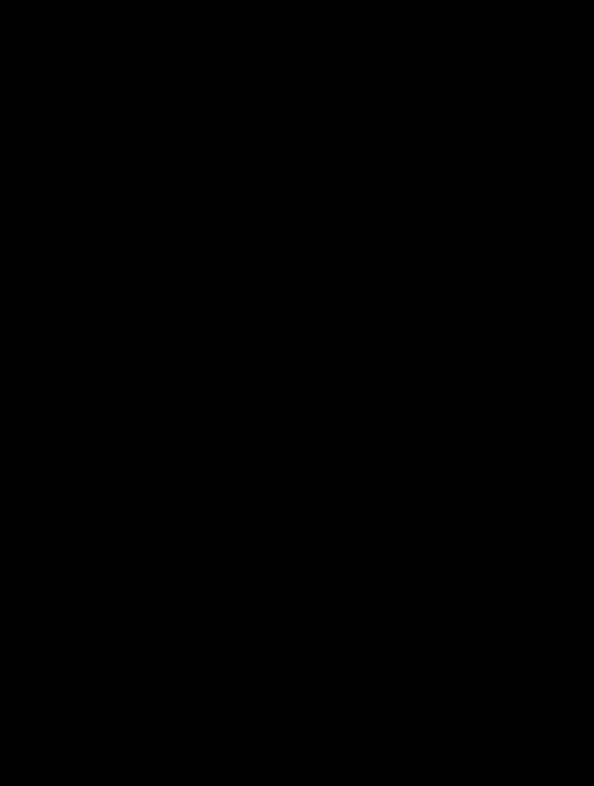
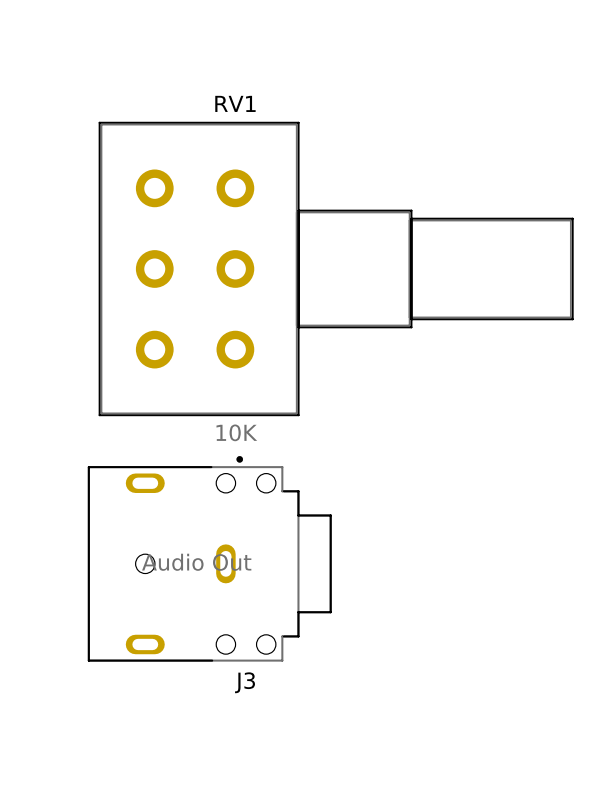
RV1: none -> 10K (336, 268)
J3: none -> Audio Out (209, 558)

